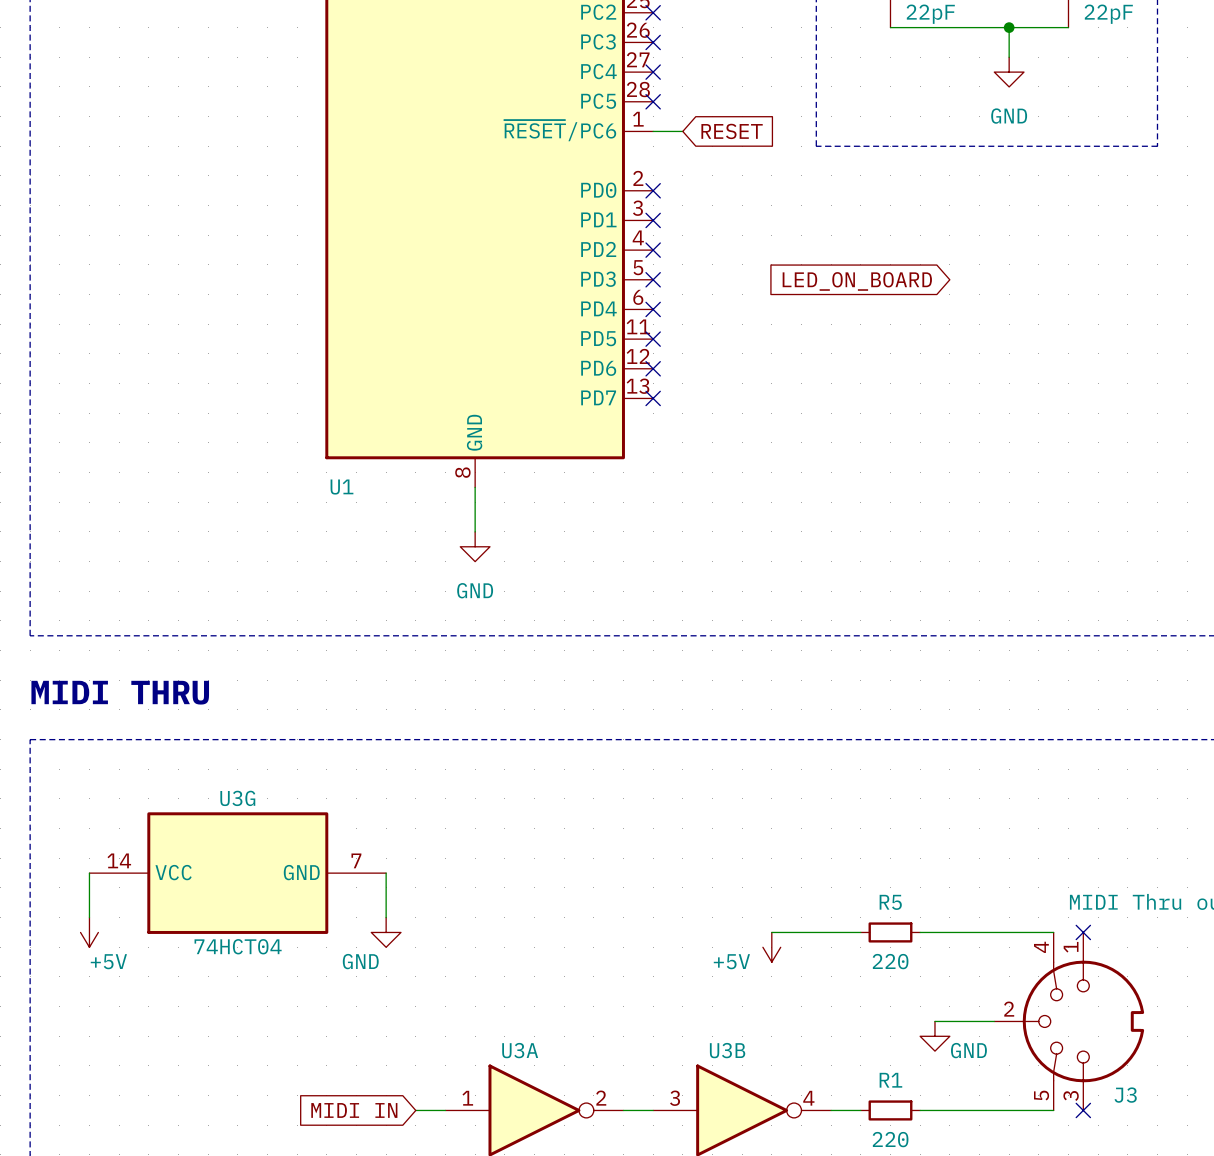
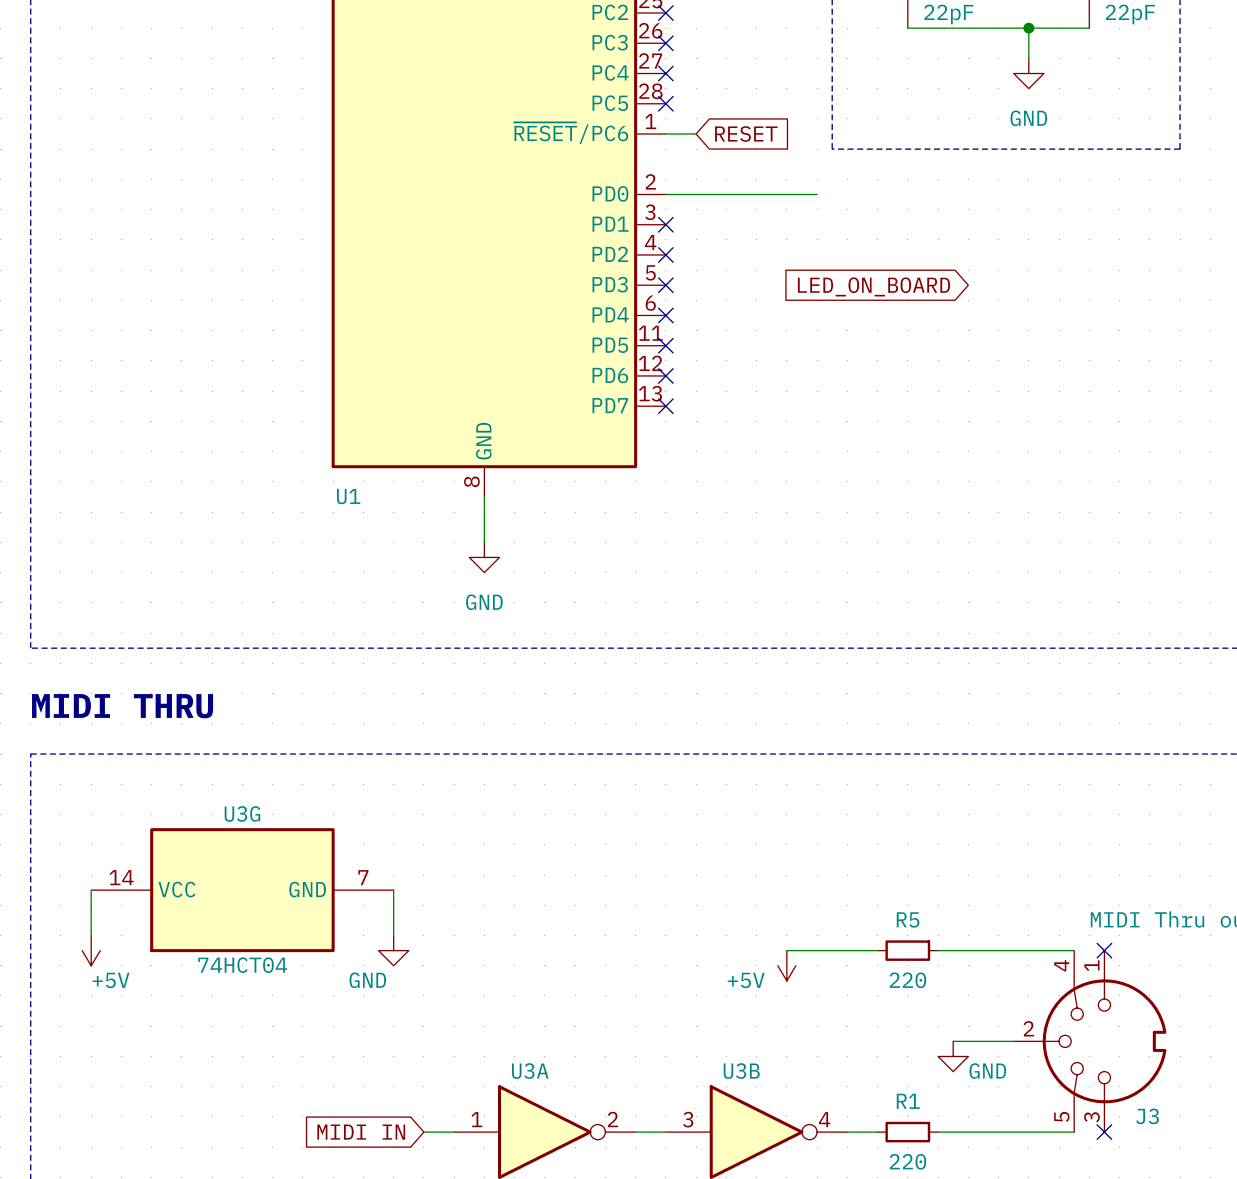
wire: none -> (665, 194) (817, 194)
no-connect mark: (653, 190) -> none

